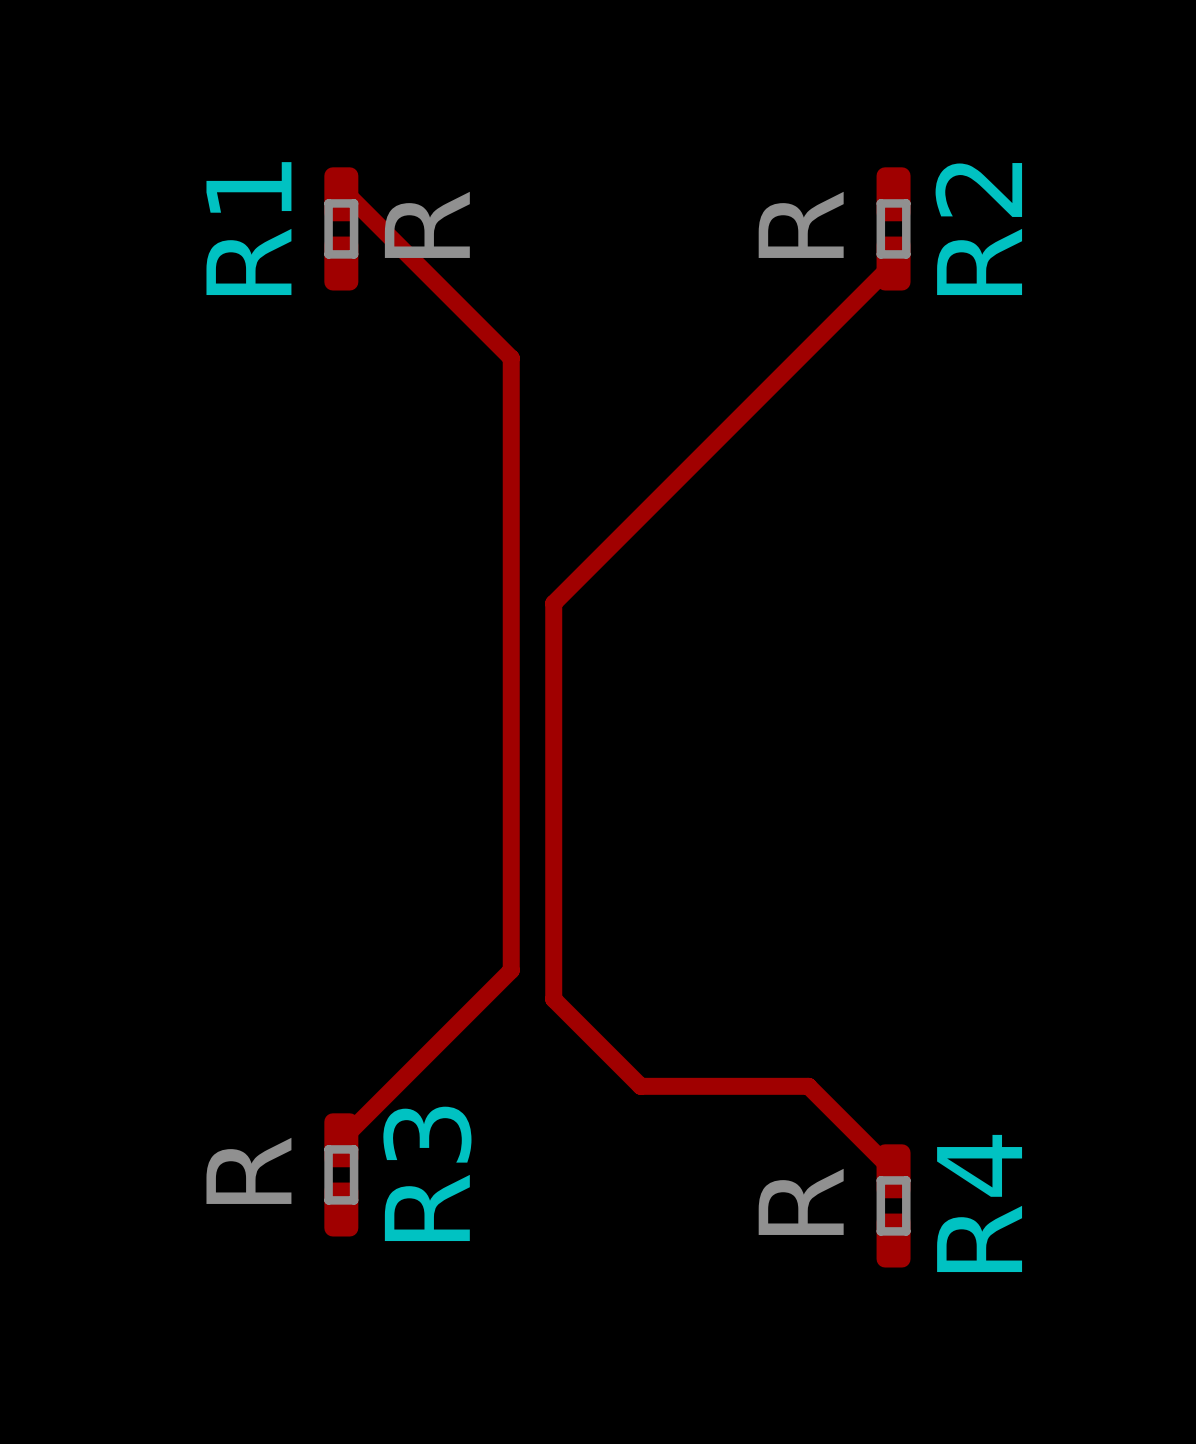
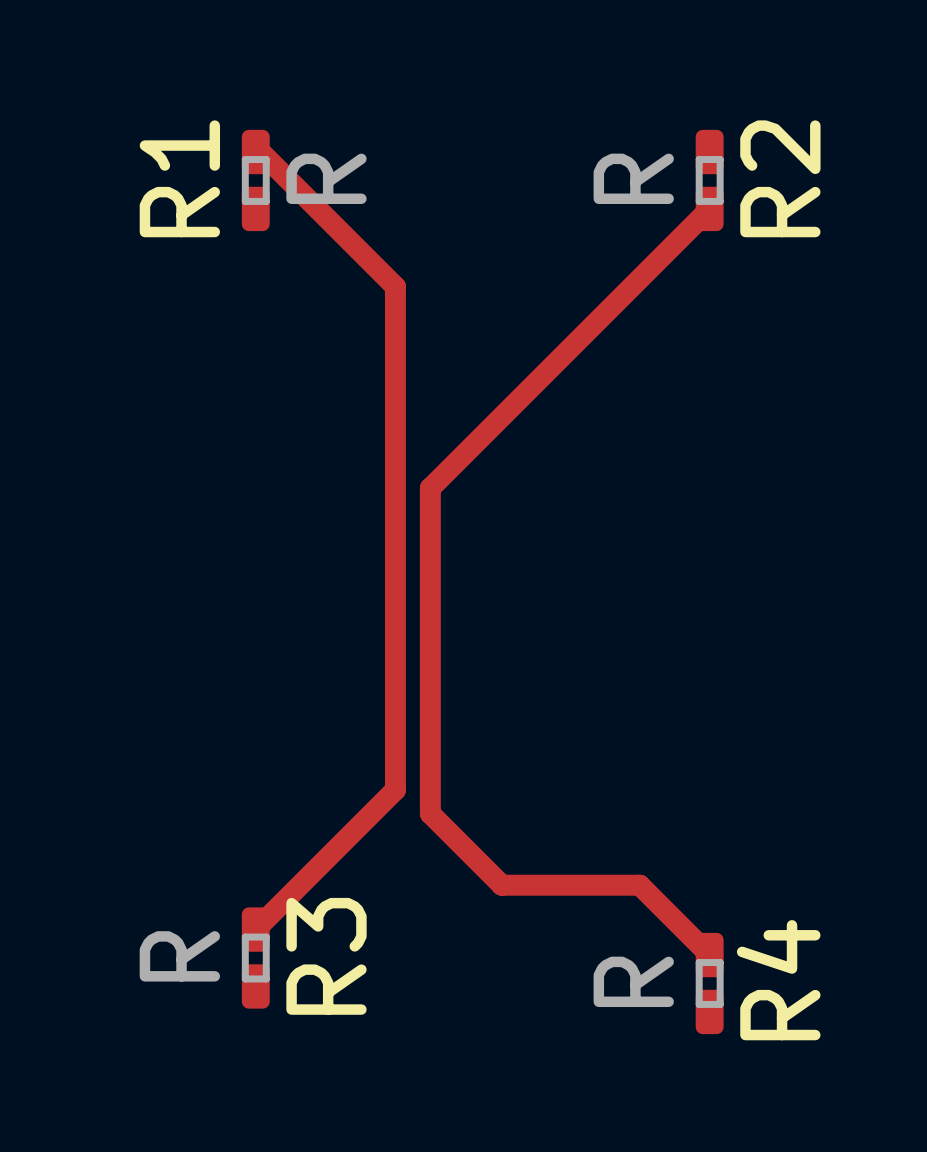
track width: thin (347, 194) (511, 358) (511, 970) (341, 1140) -> thick (260, 152) (395, 286) (395, 789) (255, 929)
track width: thin (893, 263) (553, 603) (553, 999) (640, 1086) (808, 1086) (893, 1171) -> thick (709, 208) (430, 488) (430, 813) (501, 885) (639, 885) (709, 955)

